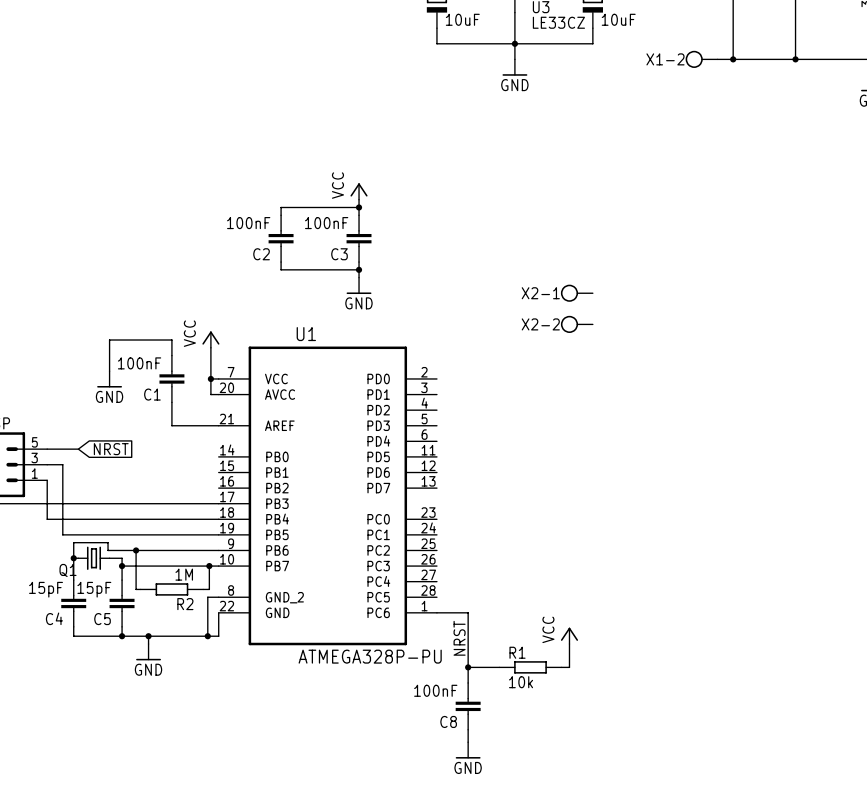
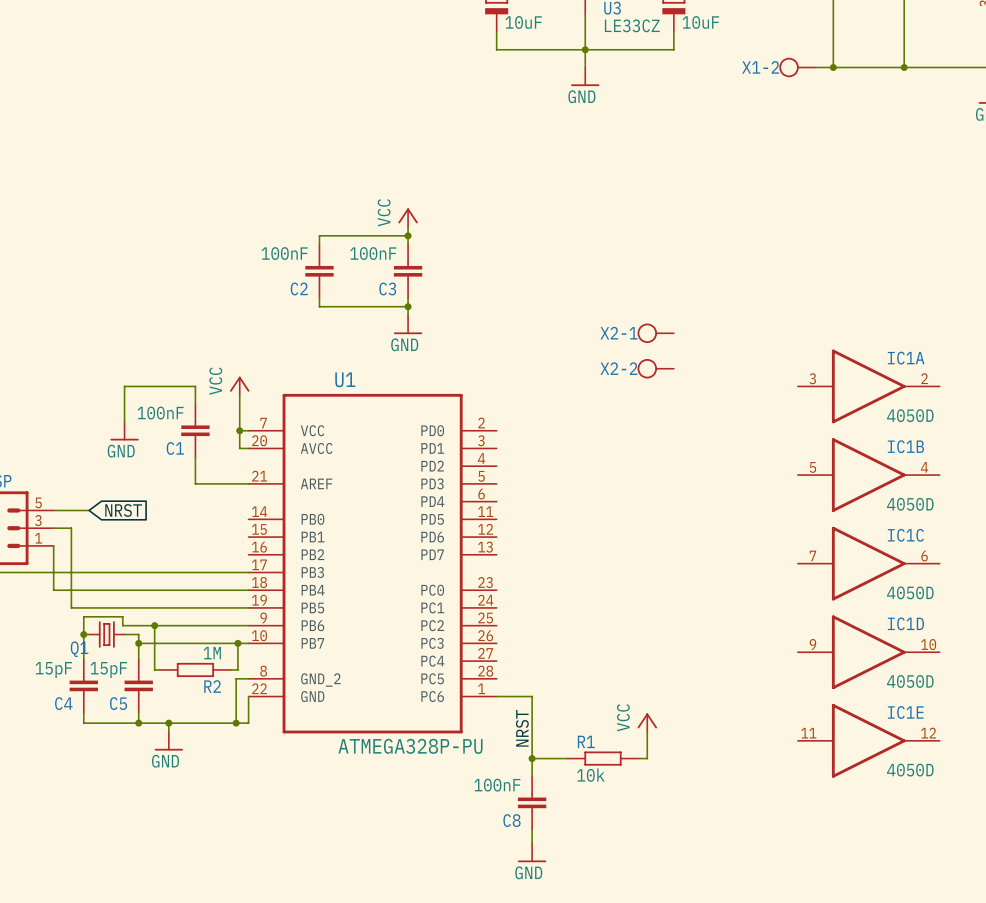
IC1A: none -> 4050D (868, 386)
IC1B: none -> 4050D (868, 475)
IC1C: none -> 4050D (868, 563)
IC1D: none -> 4050D (868, 652)
IC1E: none -> 4050D (868, 740)

